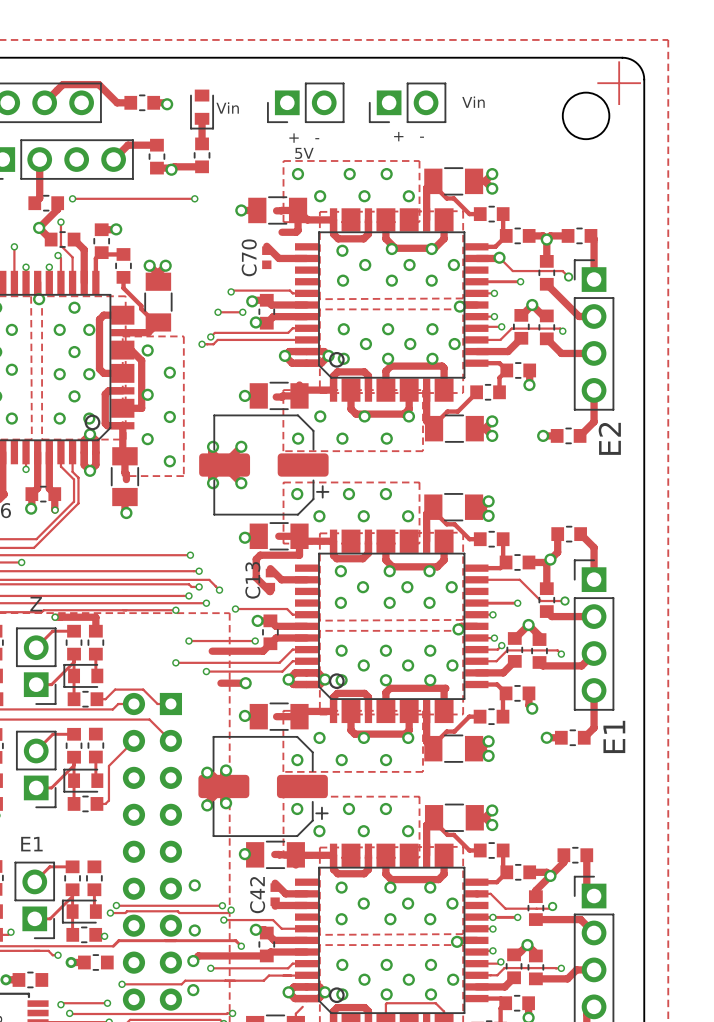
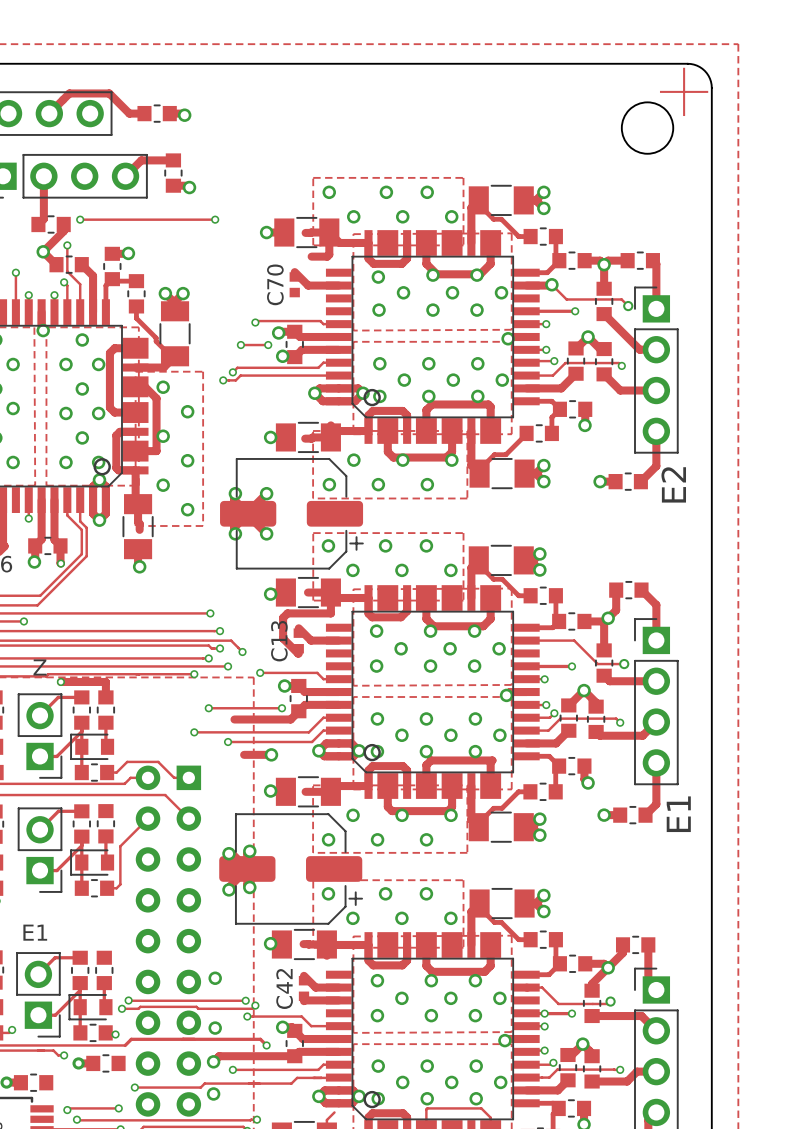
part: (305, 102) -> none
part: (407, 102) -> none
text: Vin (473, 102) -> none
text: Vin (227, 107) -> none
part: (202, 109) -> none
track: (202, 118) (202, 143) -> none
text: + - (409, 136) -> none
text: + - (304, 138) -> none
text: 5V (304, 153) -> none
part: (202, 155) -> none
track: (202, 166) (174, 166) (171, 169) -> none

